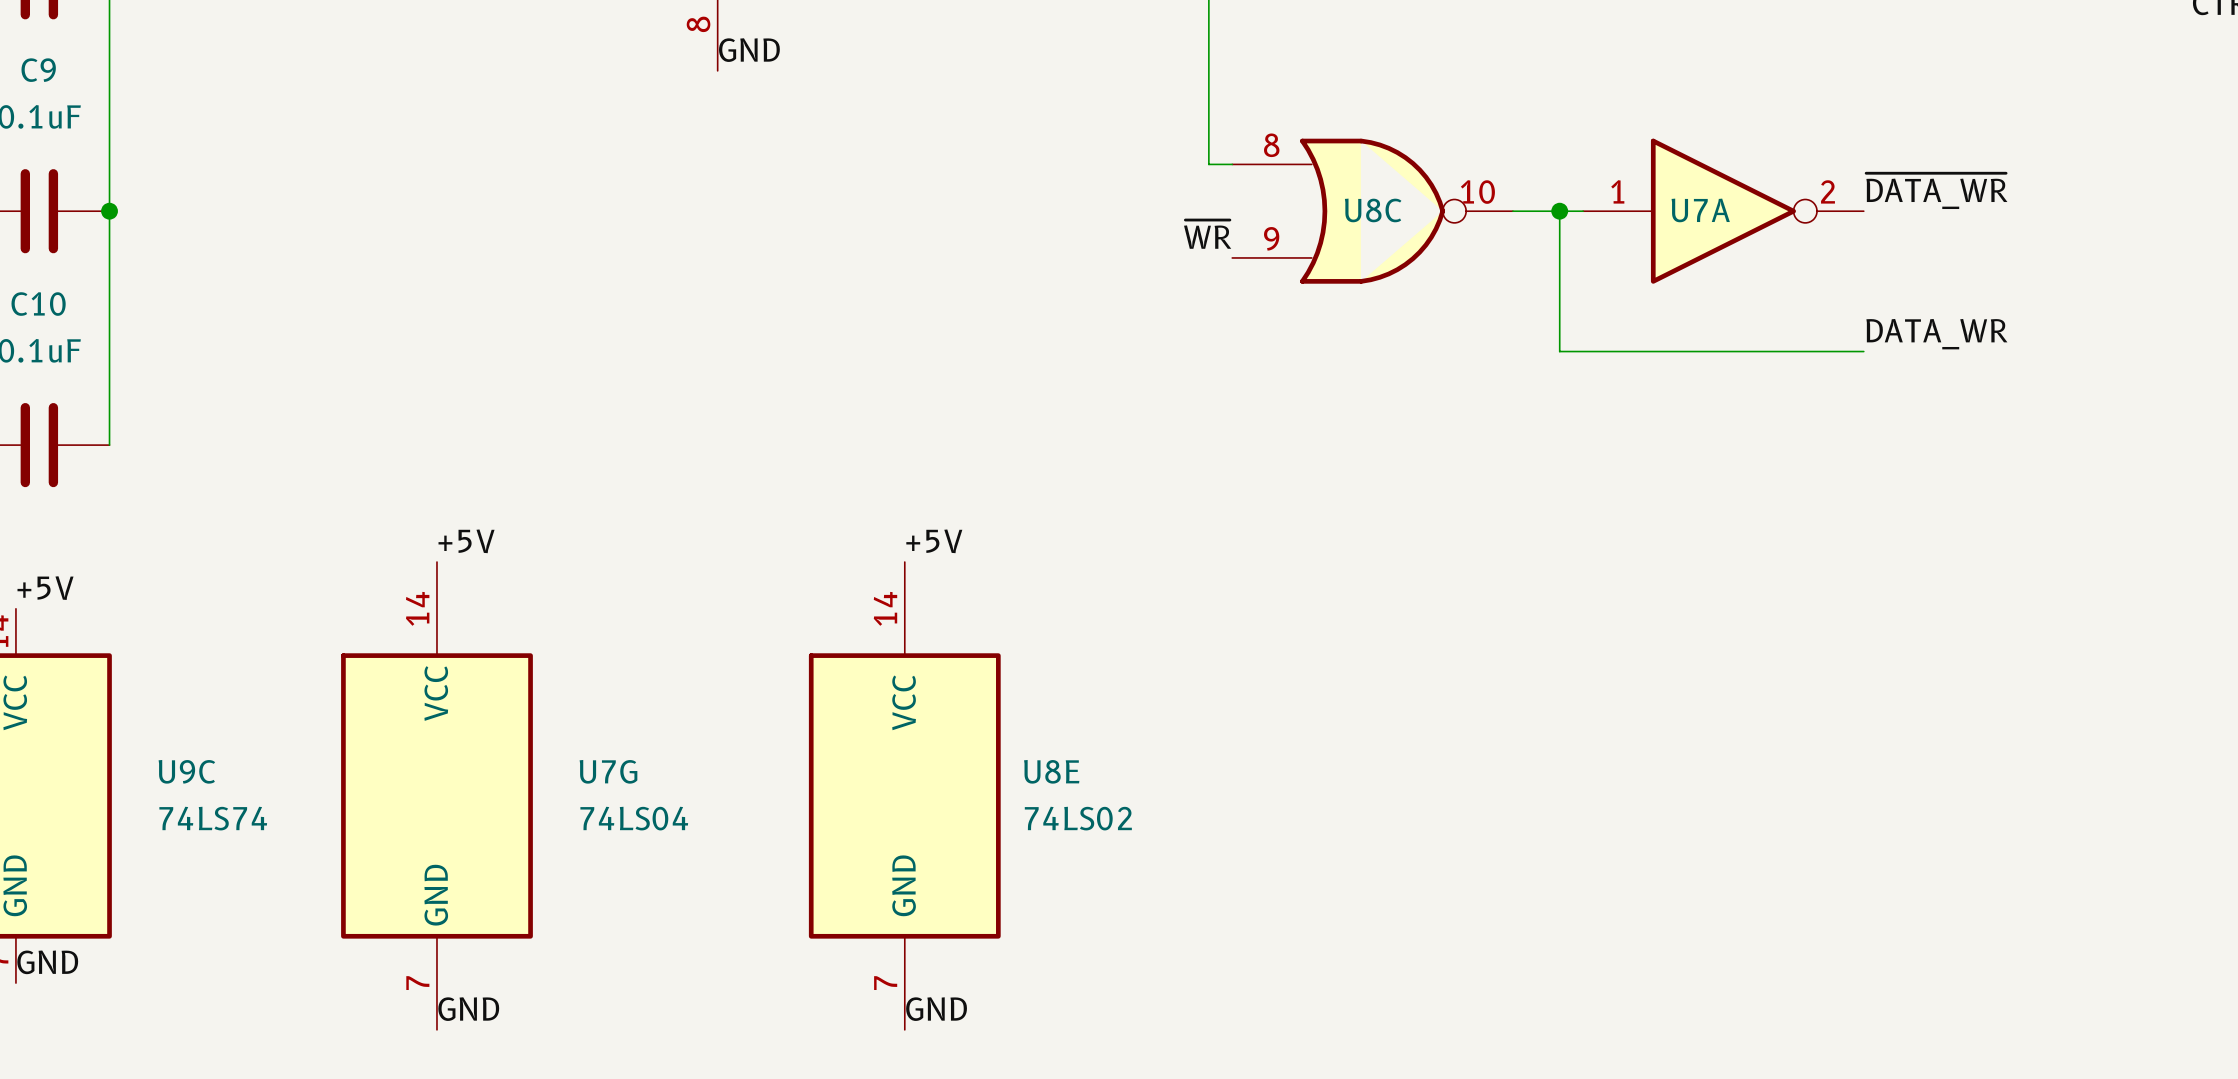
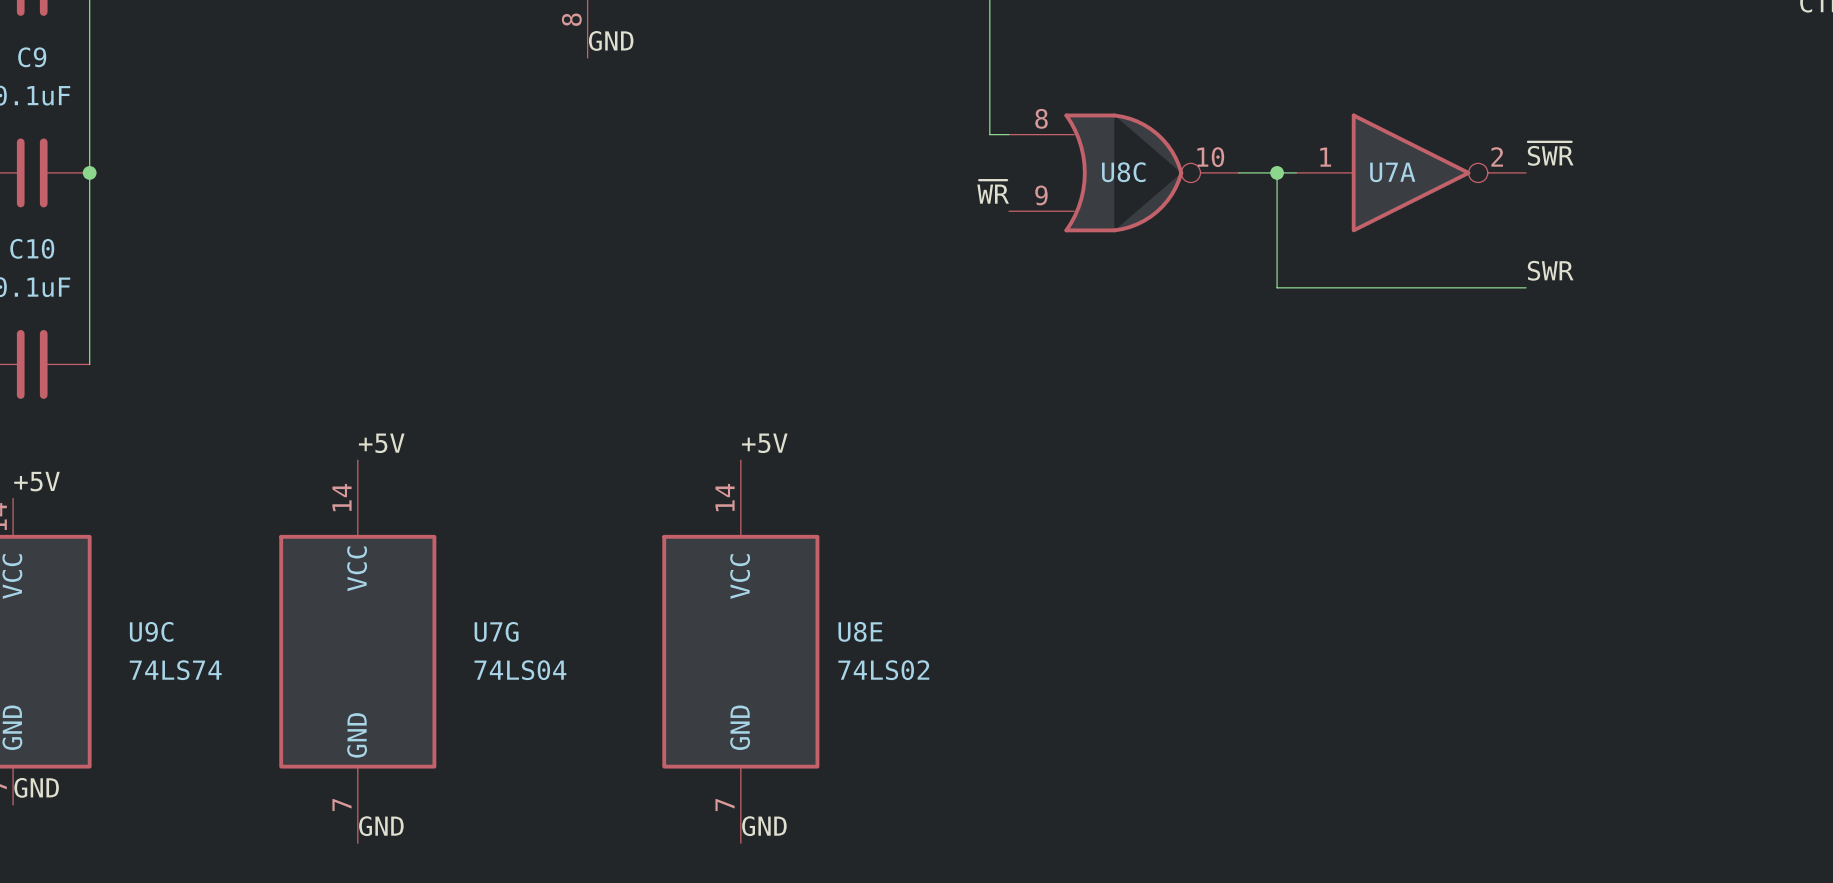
label: ~{DATA_WR} (1936, 191) -> ~{SWR} (1550, 153)
label: DATA_WR (1936, 334) -> SWR (1550, 270)

